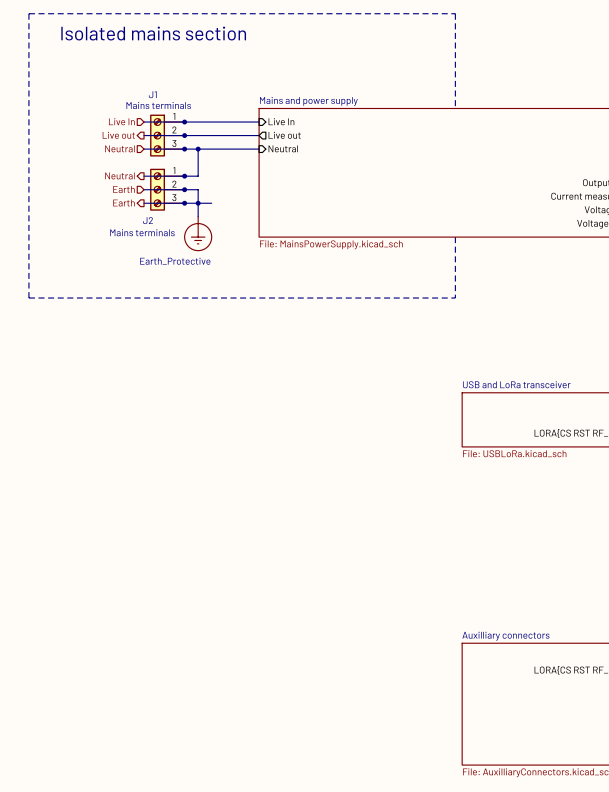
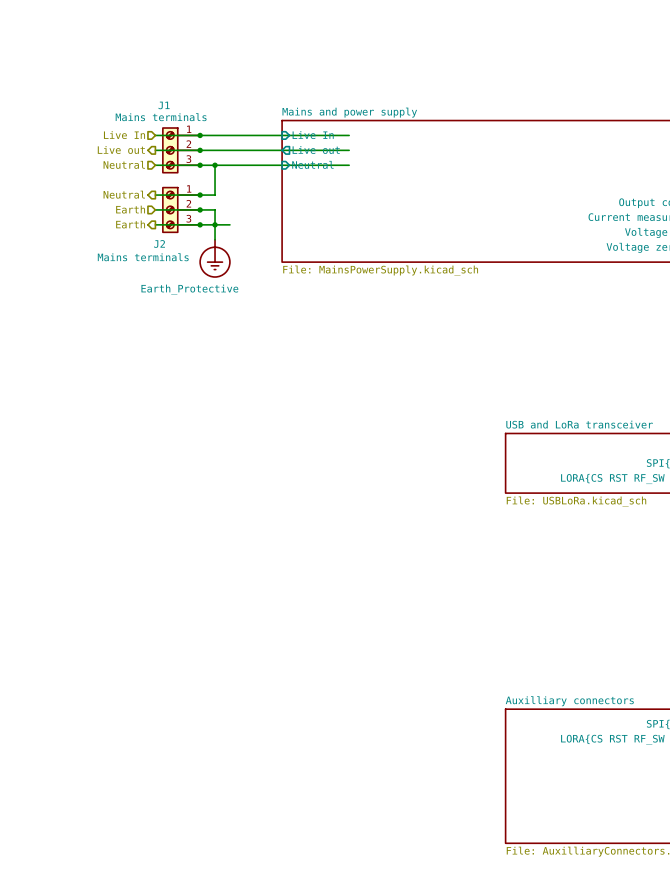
text: Isolated mains section (153, 33) -> none
line: (455, 108) (455, 13) (28, 13) (28, 298) (455, 298) (455, 237) -> none
wire: none -> (282, 135) (349, 135)
wire: none -> (282, 150) (349, 150)
wire: none -> (282, 165) (349, 165)

